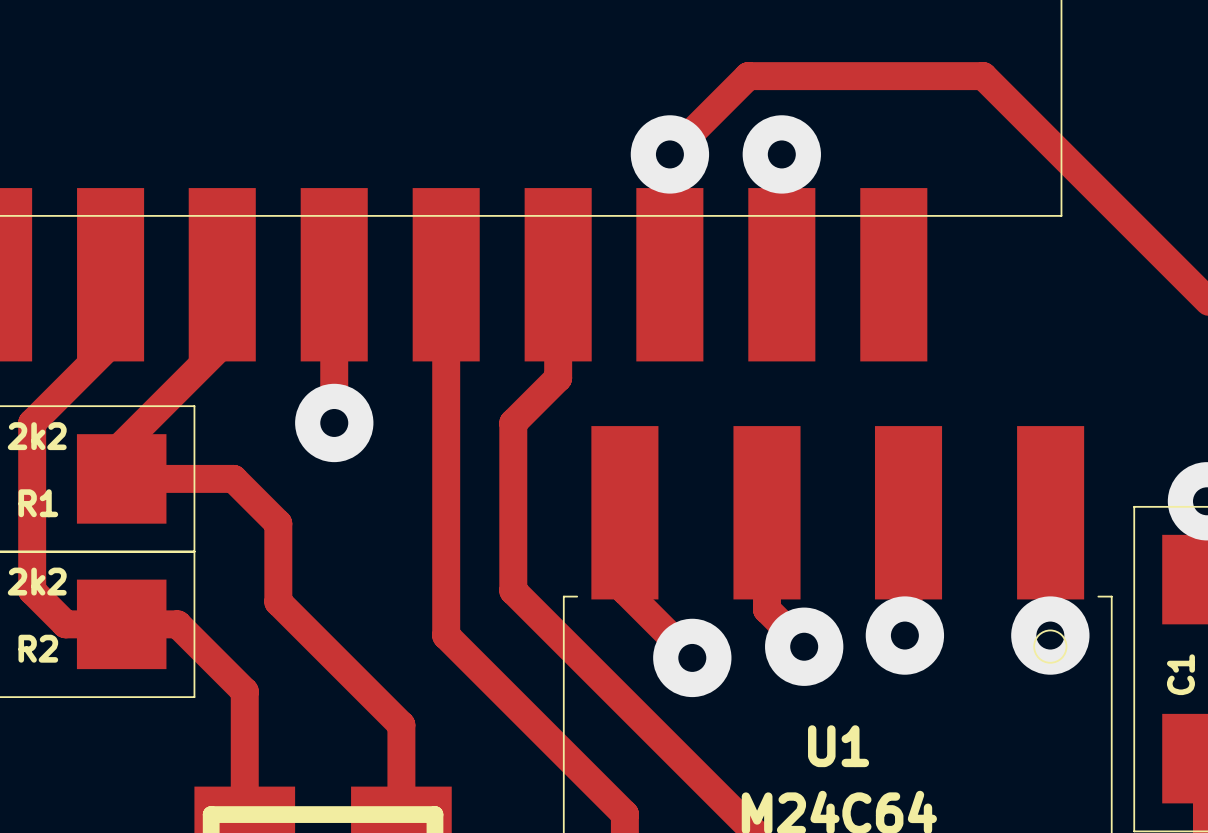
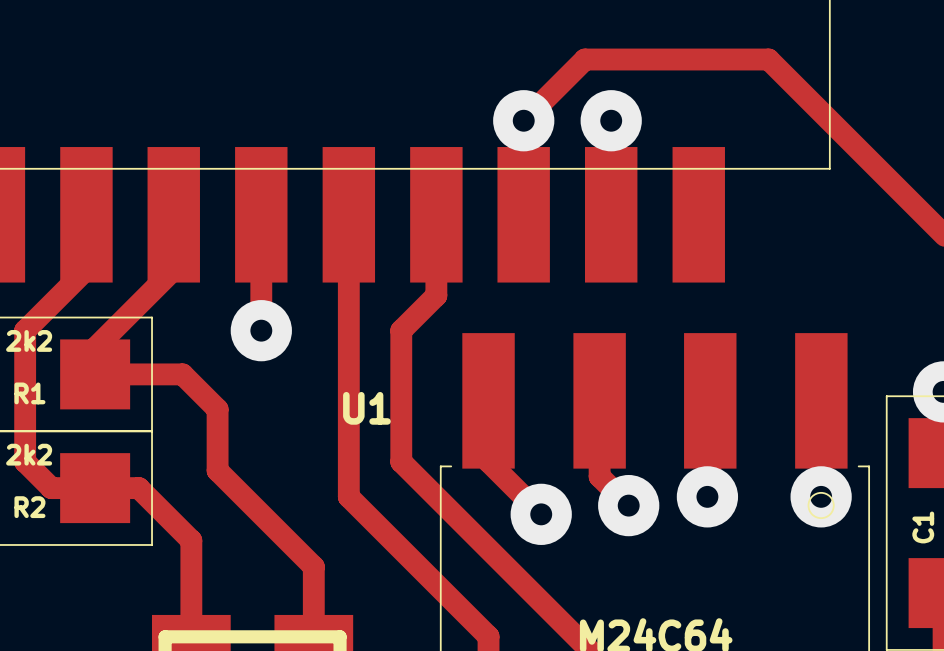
U1 name position: U1 (838, 746) -> U1 (366, 408)

